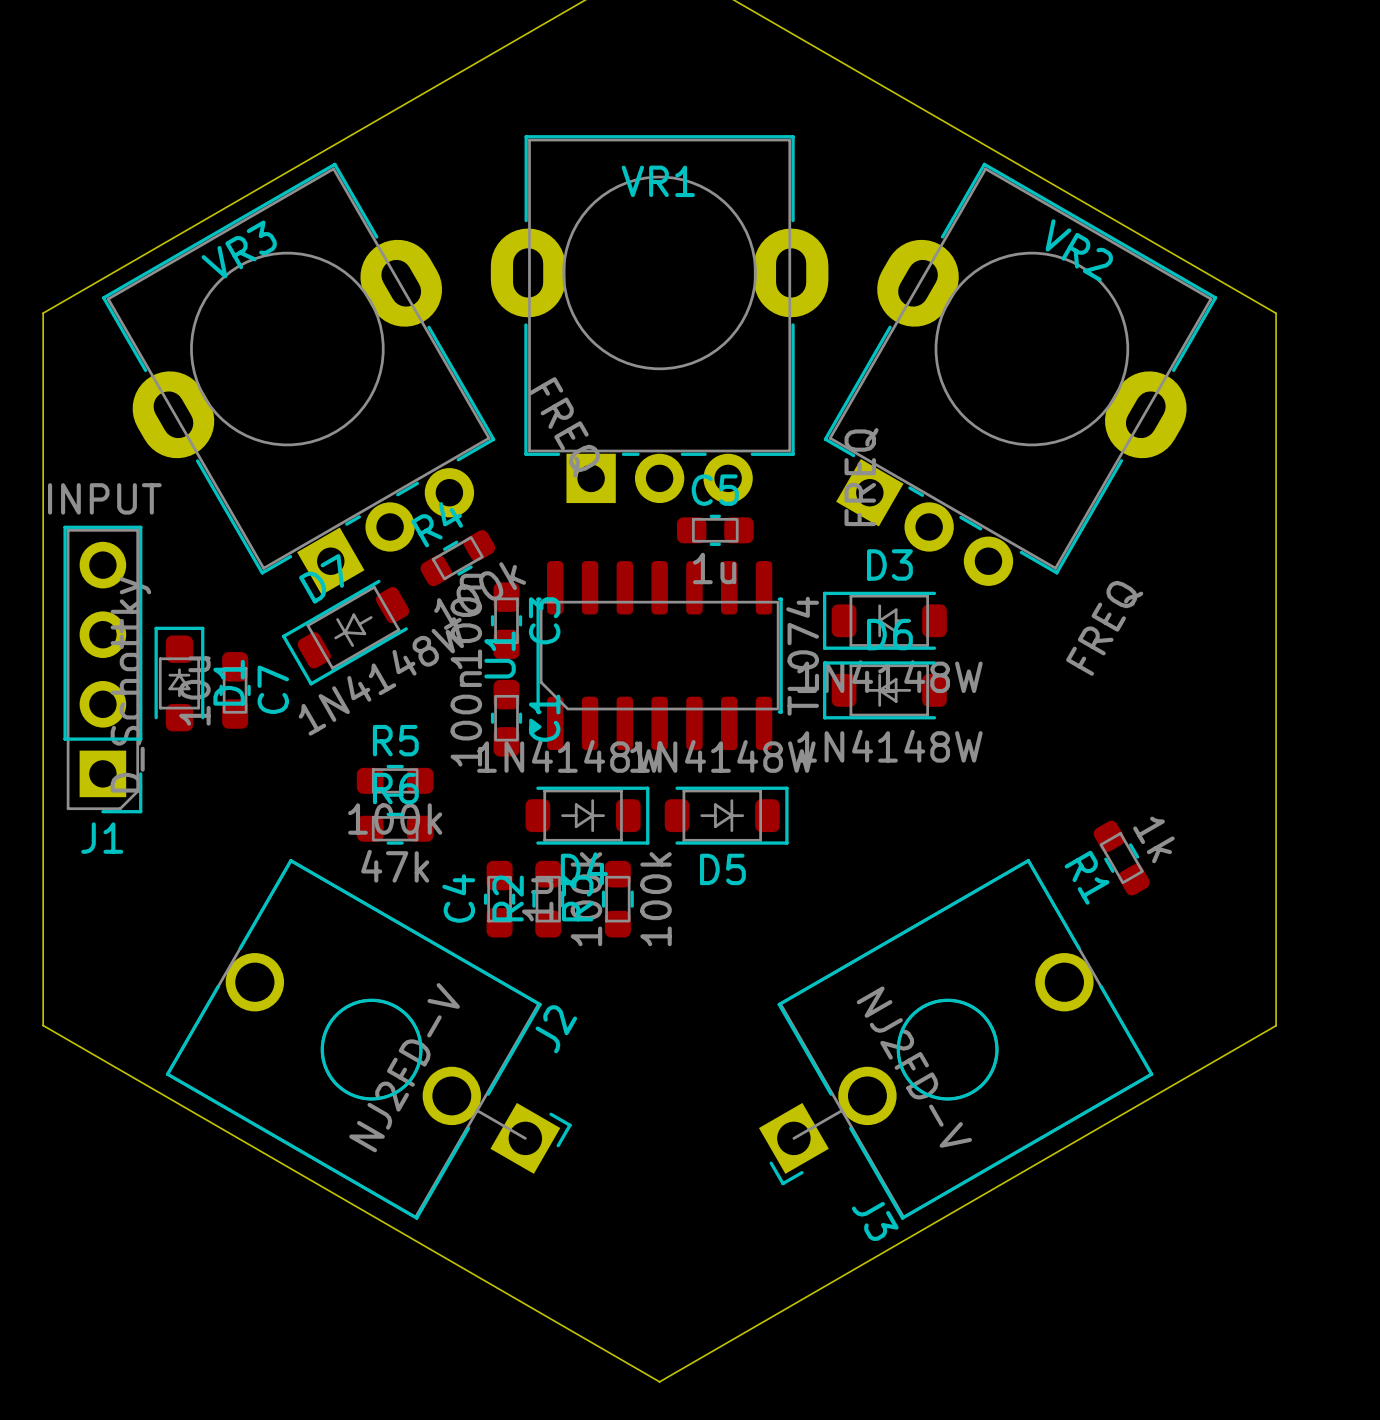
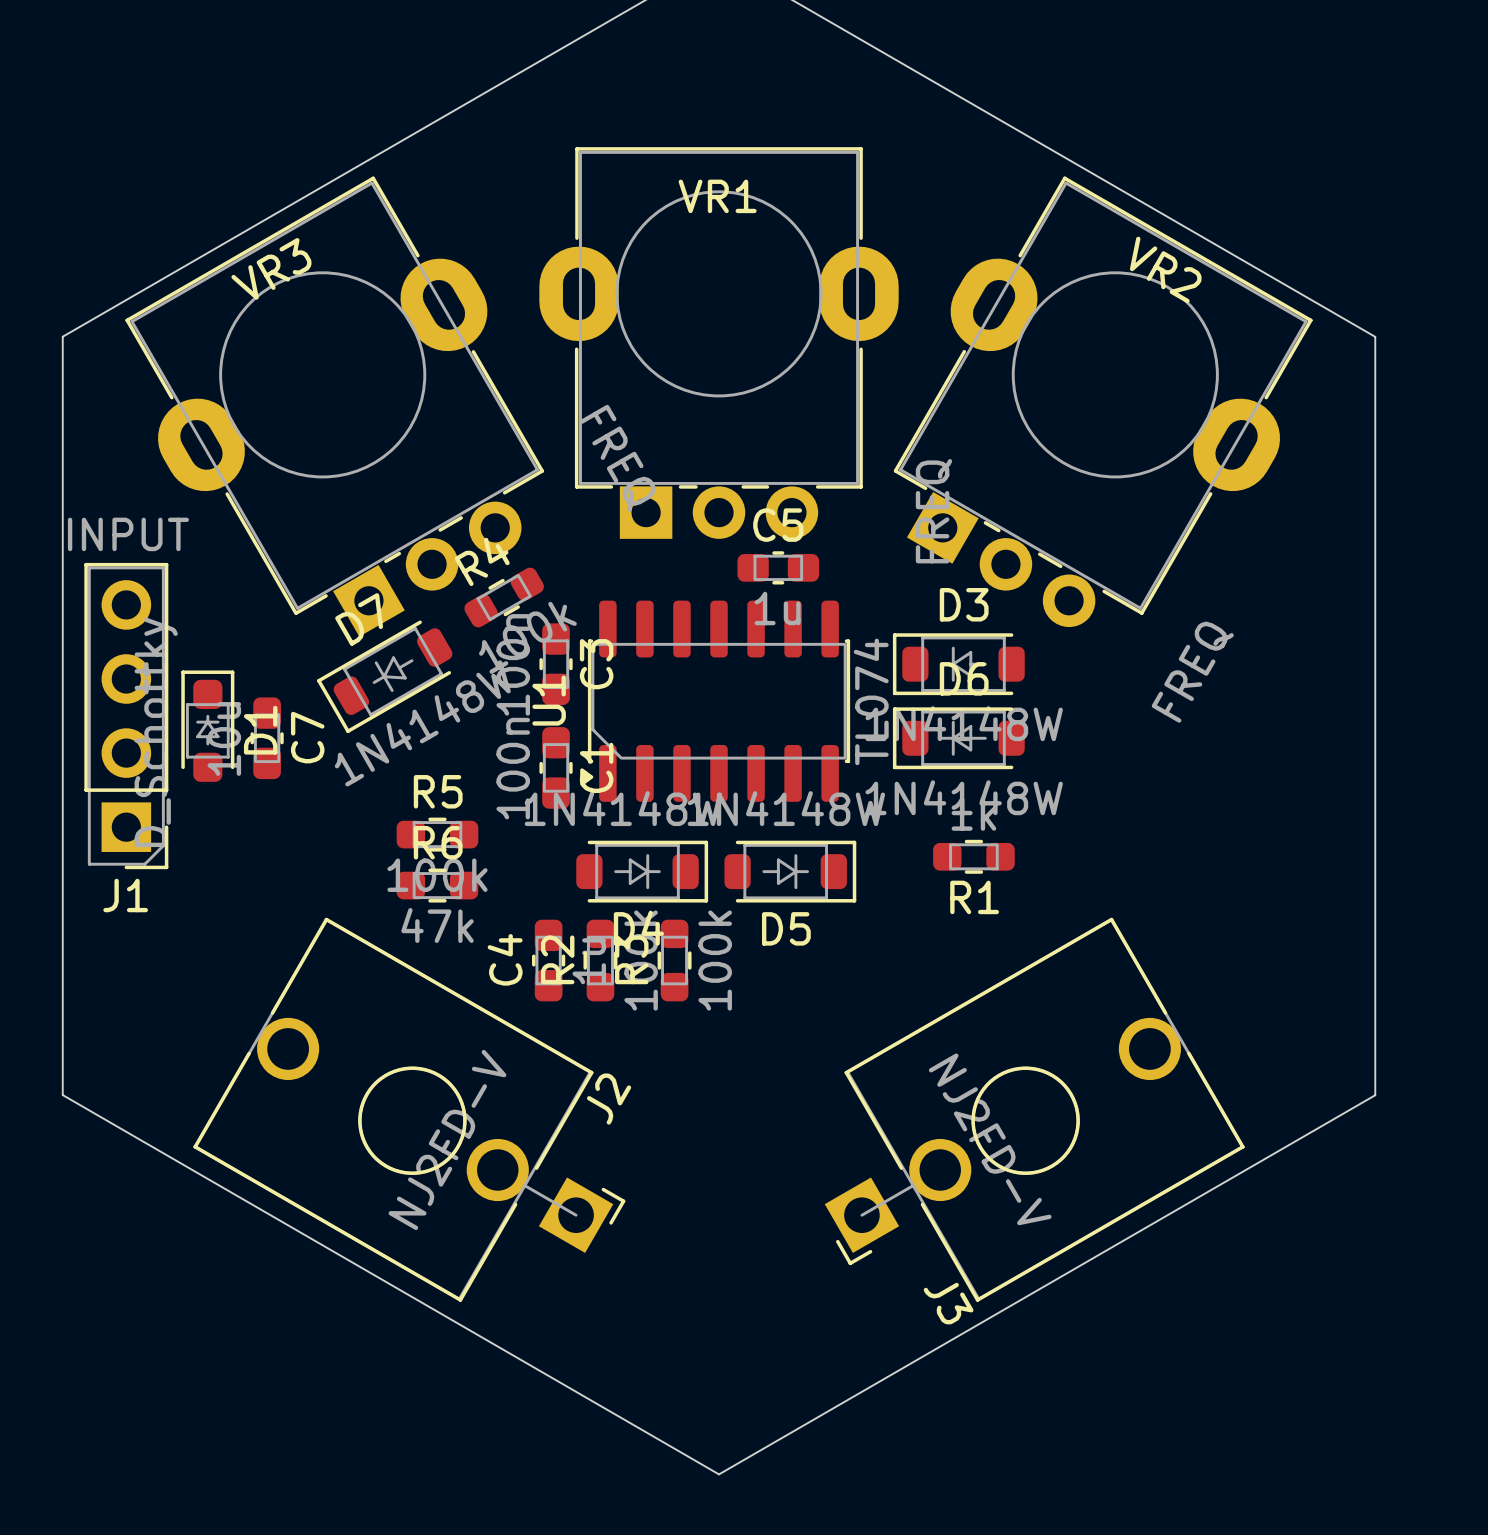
R1 rotation: 0° (1121, 858) -> 60° counterclockwise (973, 856)
R1 position: (1121, 858) -> (973, 856)

